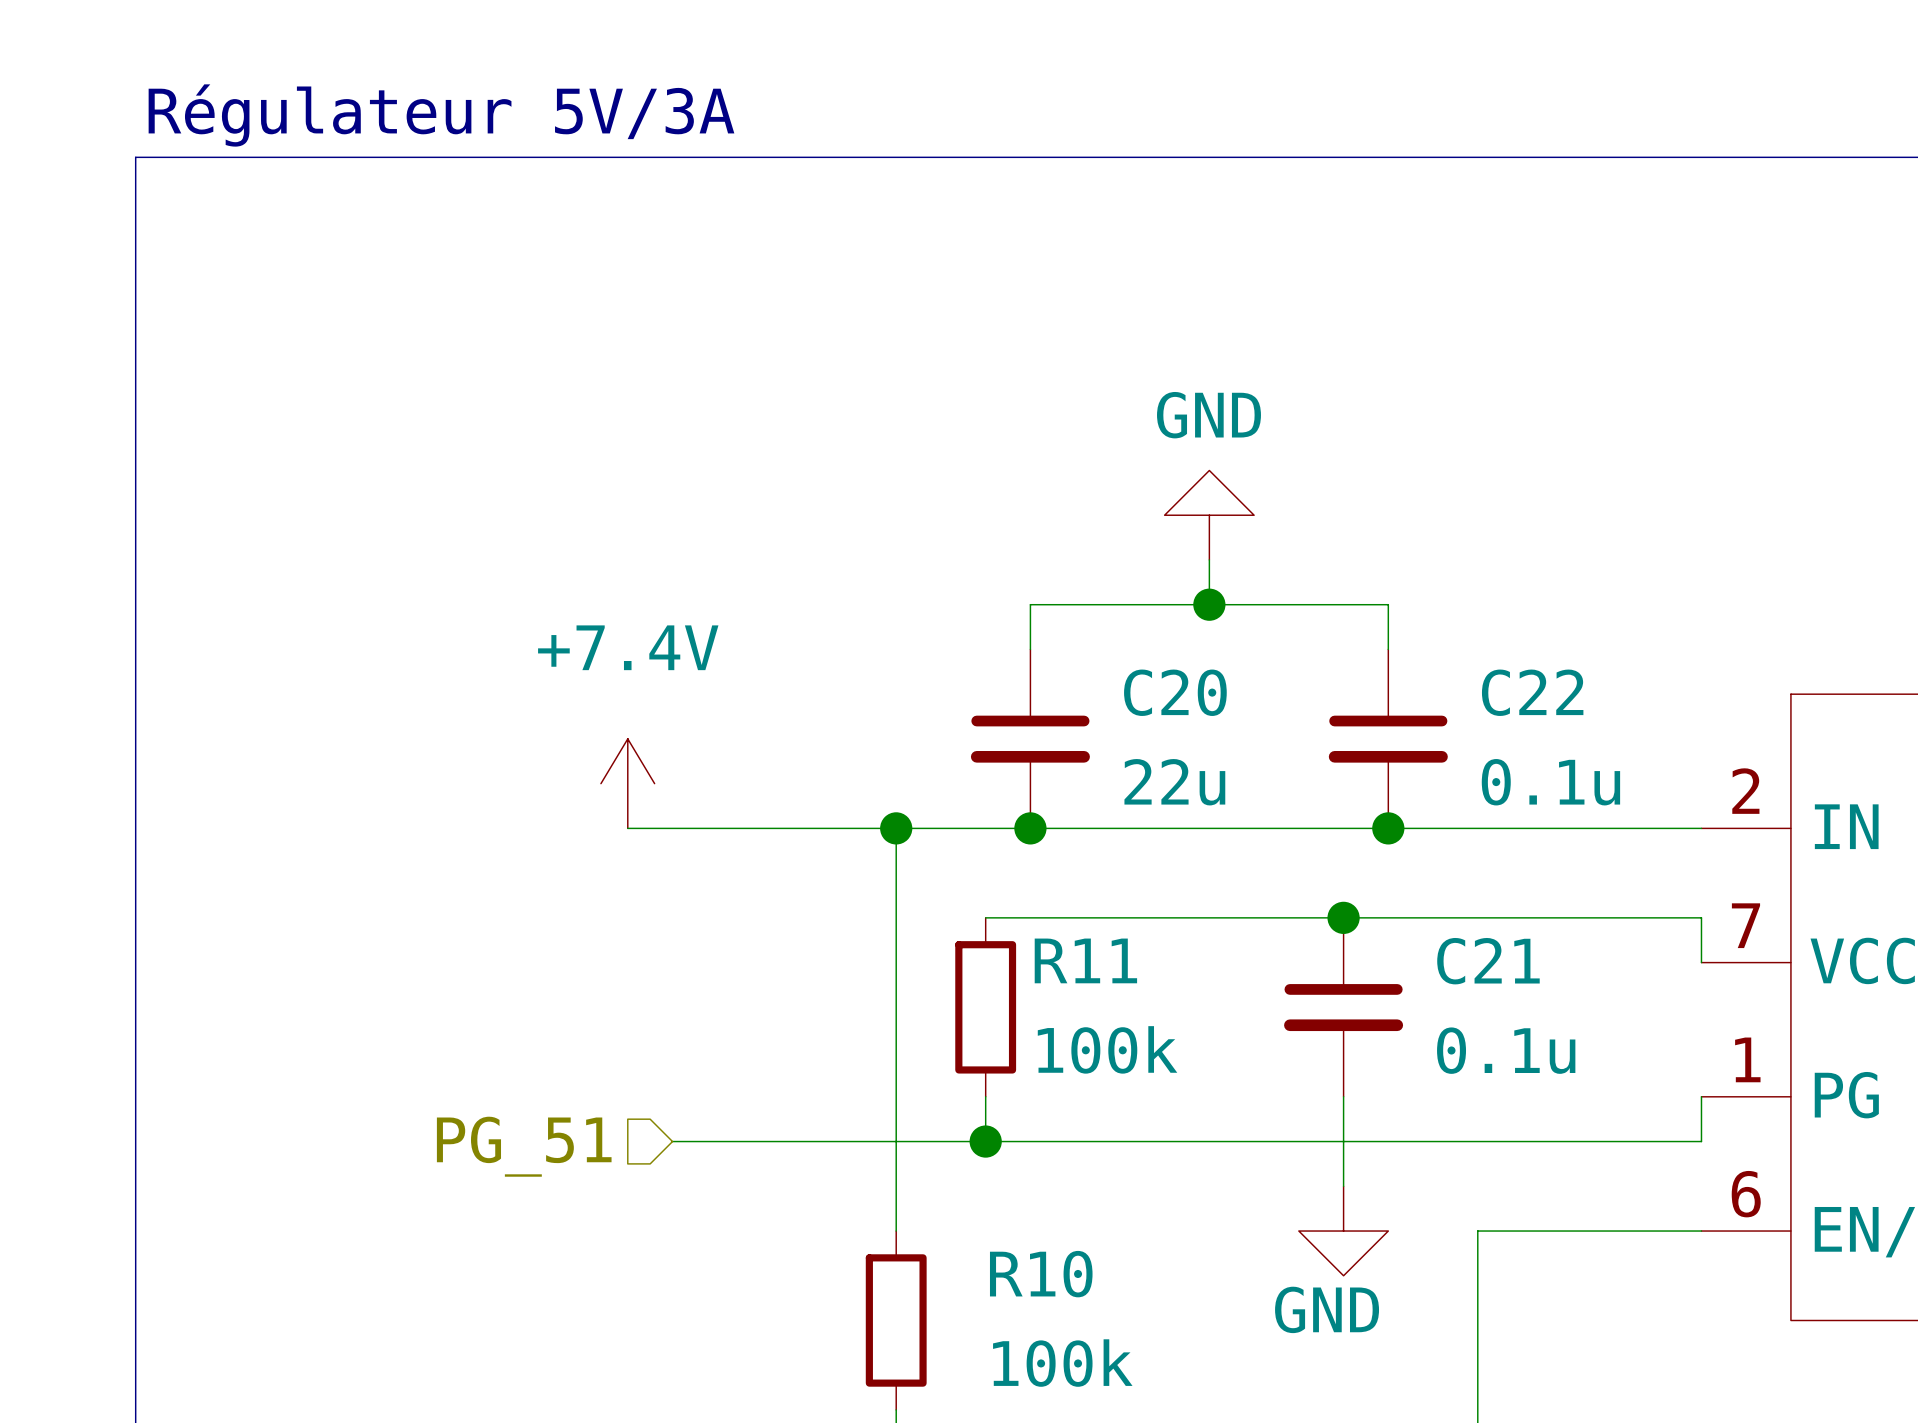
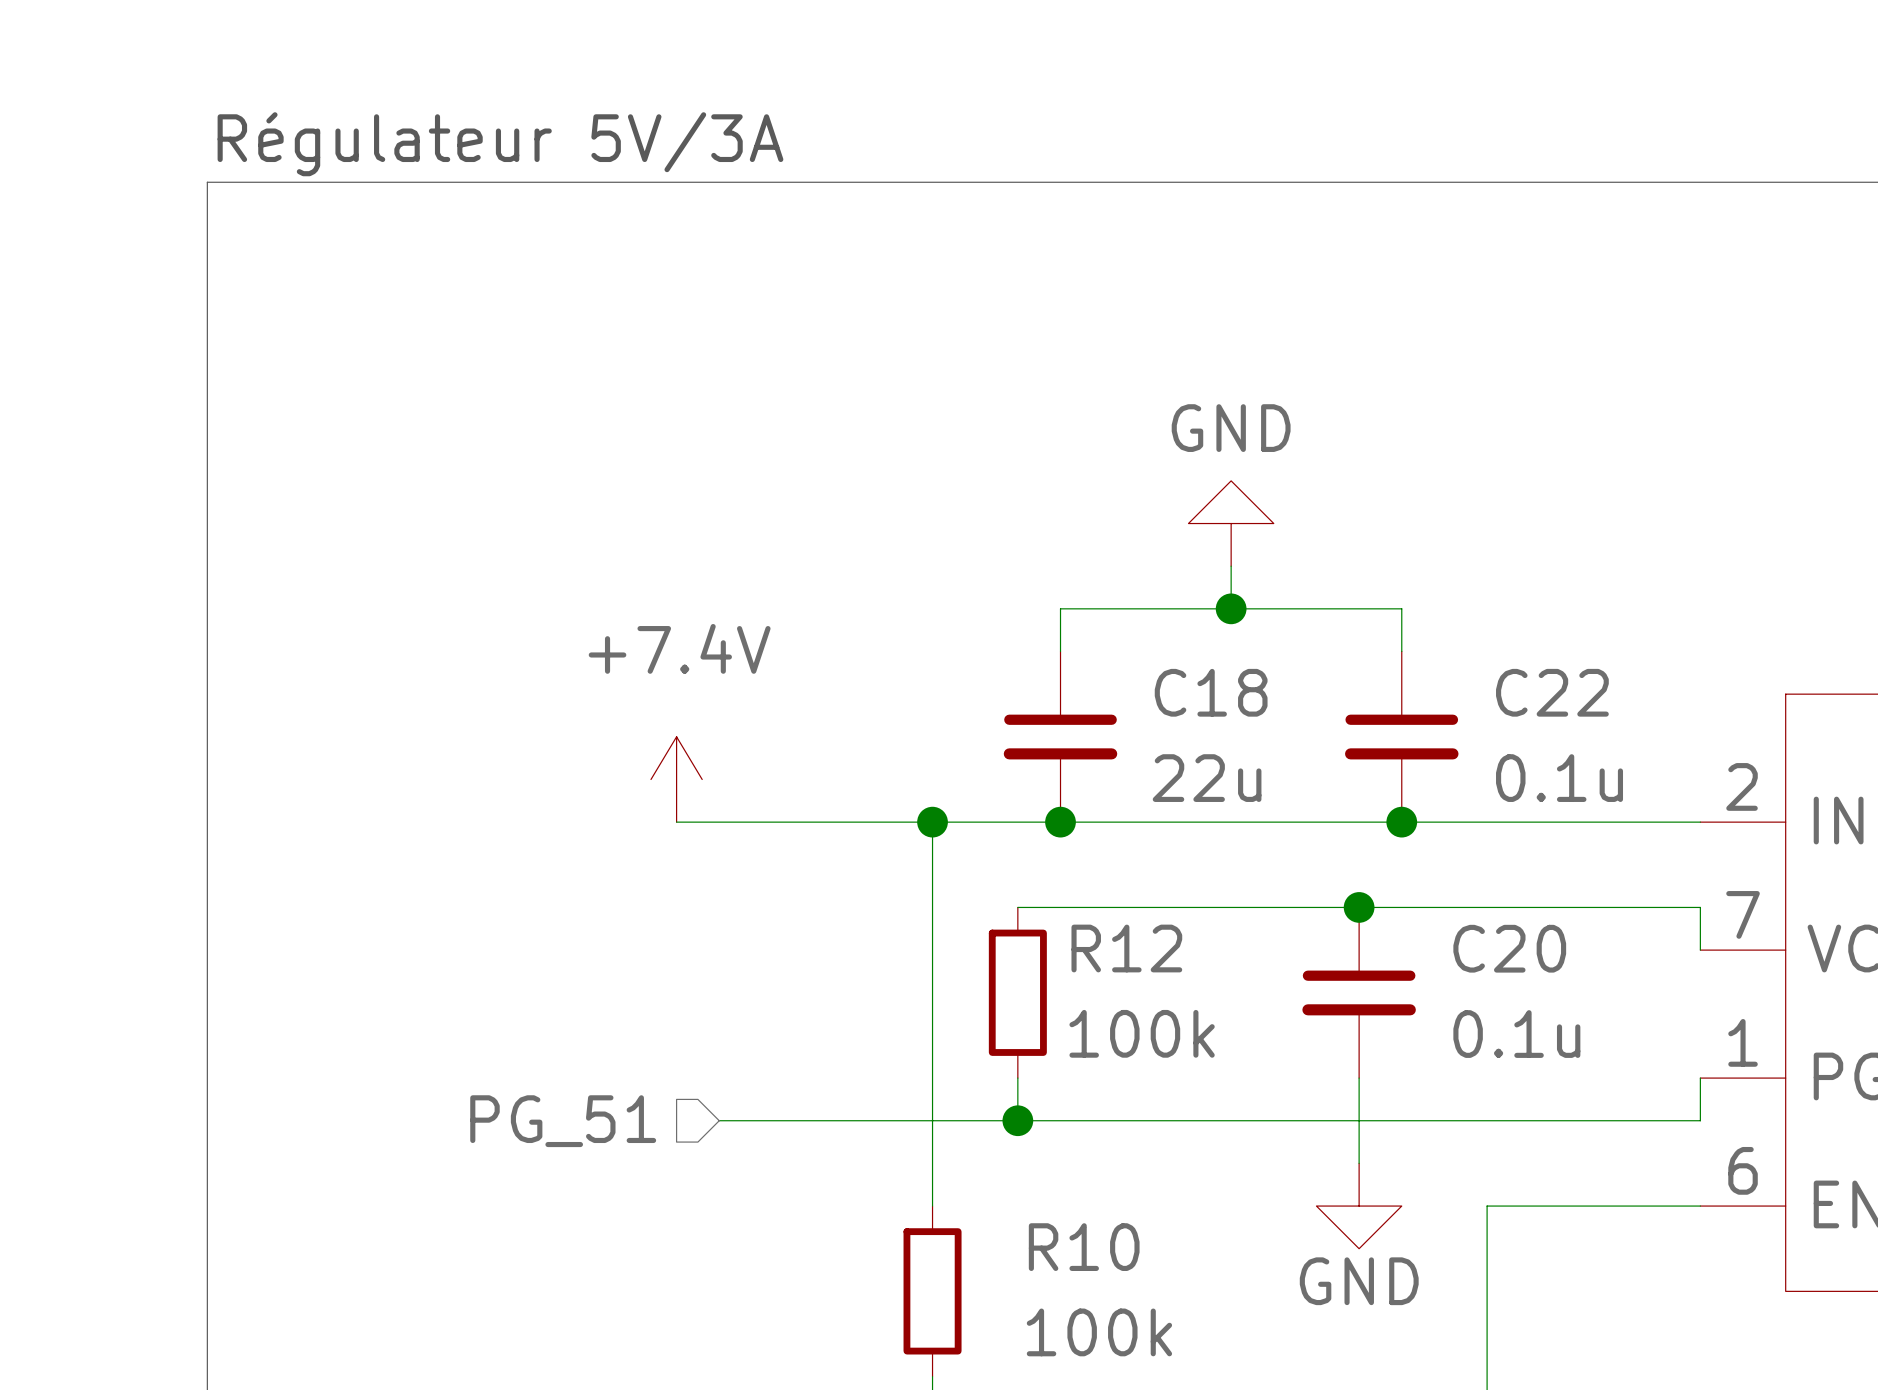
C20 name: C20 (1175, 692) -> C18 (1211, 692)
R11 name: R11 (1085, 960) -> R12 (1126, 948)
C21 name: C21 (1488, 961) -> C20 (1509, 948)

